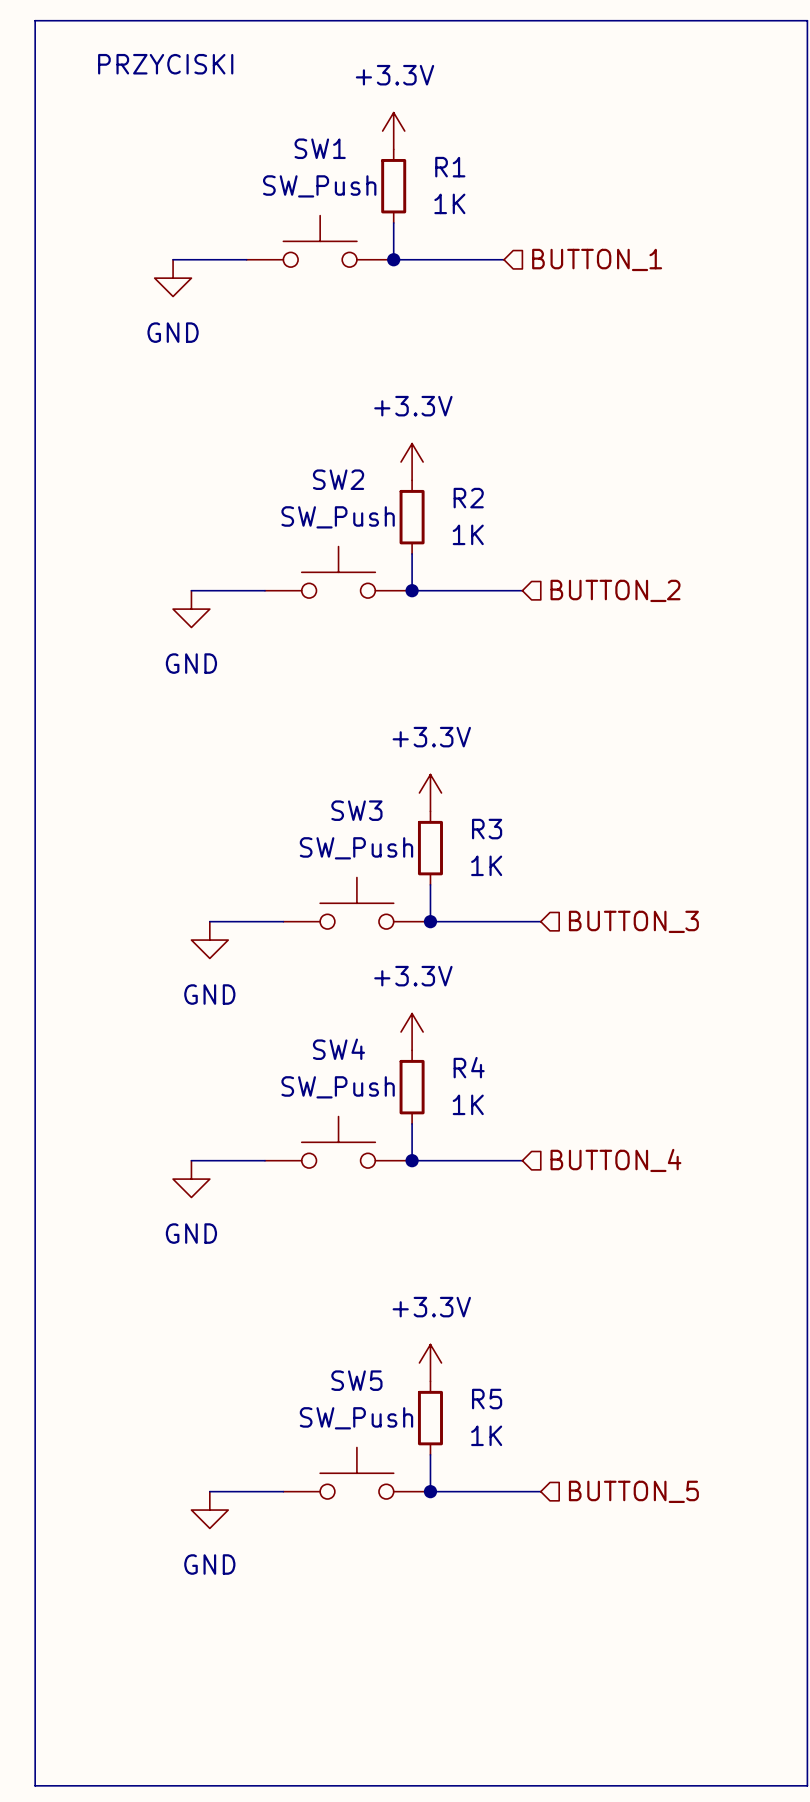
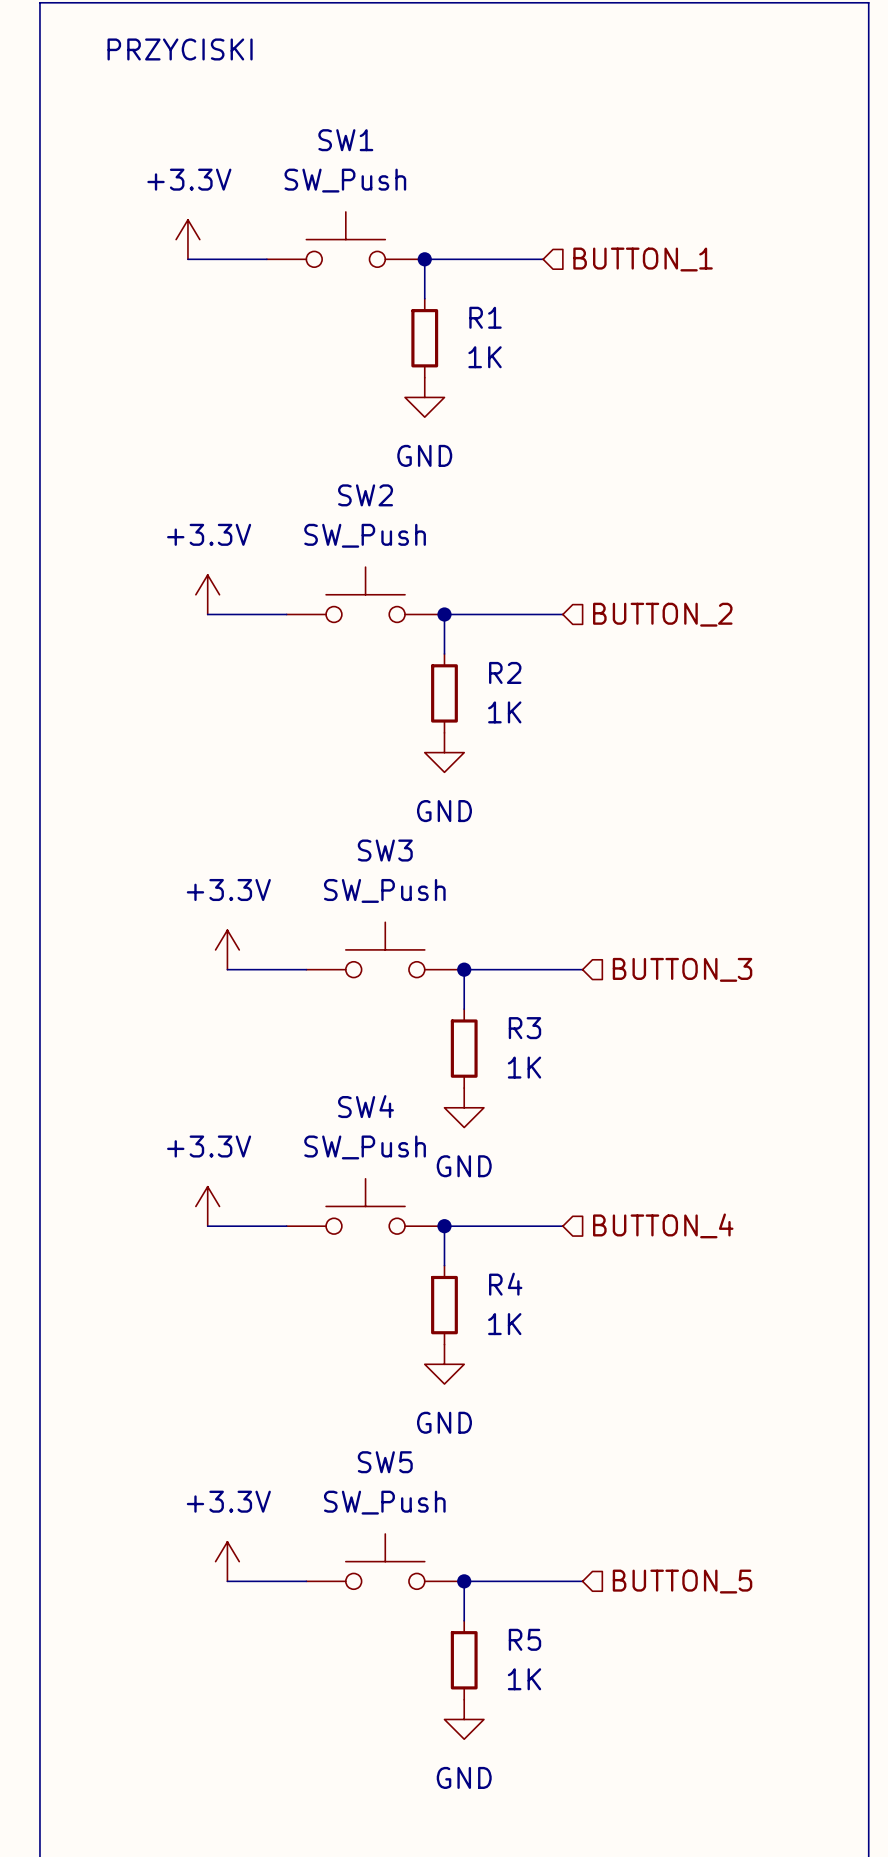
power symbol: +3.3V (393, 131) -> none
R1 position: (393, 186) -> (424, 338)
wire: (393, 222) (393, 259) -> (424, 298) (424, 259)
power symbol: none -> +3.3V (187, 239)
power symbol: GND (173, 278) -> none
power symbol: none -> GND (424, 397)
power symbol: +3.3V (412, 462) -> none
R2 position: (412, 517) -> (444, 693)
wire: (412, 553) (412, 590) -> (444, 653) (444, 614)
power symbol: none -> +3.3V (207, 594)
power symbol: GND (191, 609) -> none
power symbol: none -> GND (444, 752)
power symbol: +3.3V (430, 792) -> none
R3 position: (430, 848) -> (464, 1048)
wire: (430, 884) (430, 921) -> (464, 1009) (464, 969)
power symbol: none -> +3.3V (227, 949)
power symbol: GND (209, 940) -> none
power symbol: +3.3V (412, 1031) -> none
power symbol: none -> GND (464, 1107)
R4 position: (412, 1087) -> (444, 1305)
wire: (412, 1123) (412, 1160) -> (444, 1265) (444, 1226)
power symbol: none -> +3.3V (207, 1206)
power symbol: GND (191, 1179) -> none
power symbol: none -> GND (444, 1364)
power symbol: +3.3V (430, 1362) -> none
R5 position: (430, 1418) -> (464, 1660)
wire: (430, 1454) (430, 1491) -> (464, 1620) (464, 1581)
power symbol: none -> +3.3V (227, 1561)
power symbol: GND (209, 1510) -> none
power symbol: none -> GND (464, 1719)

